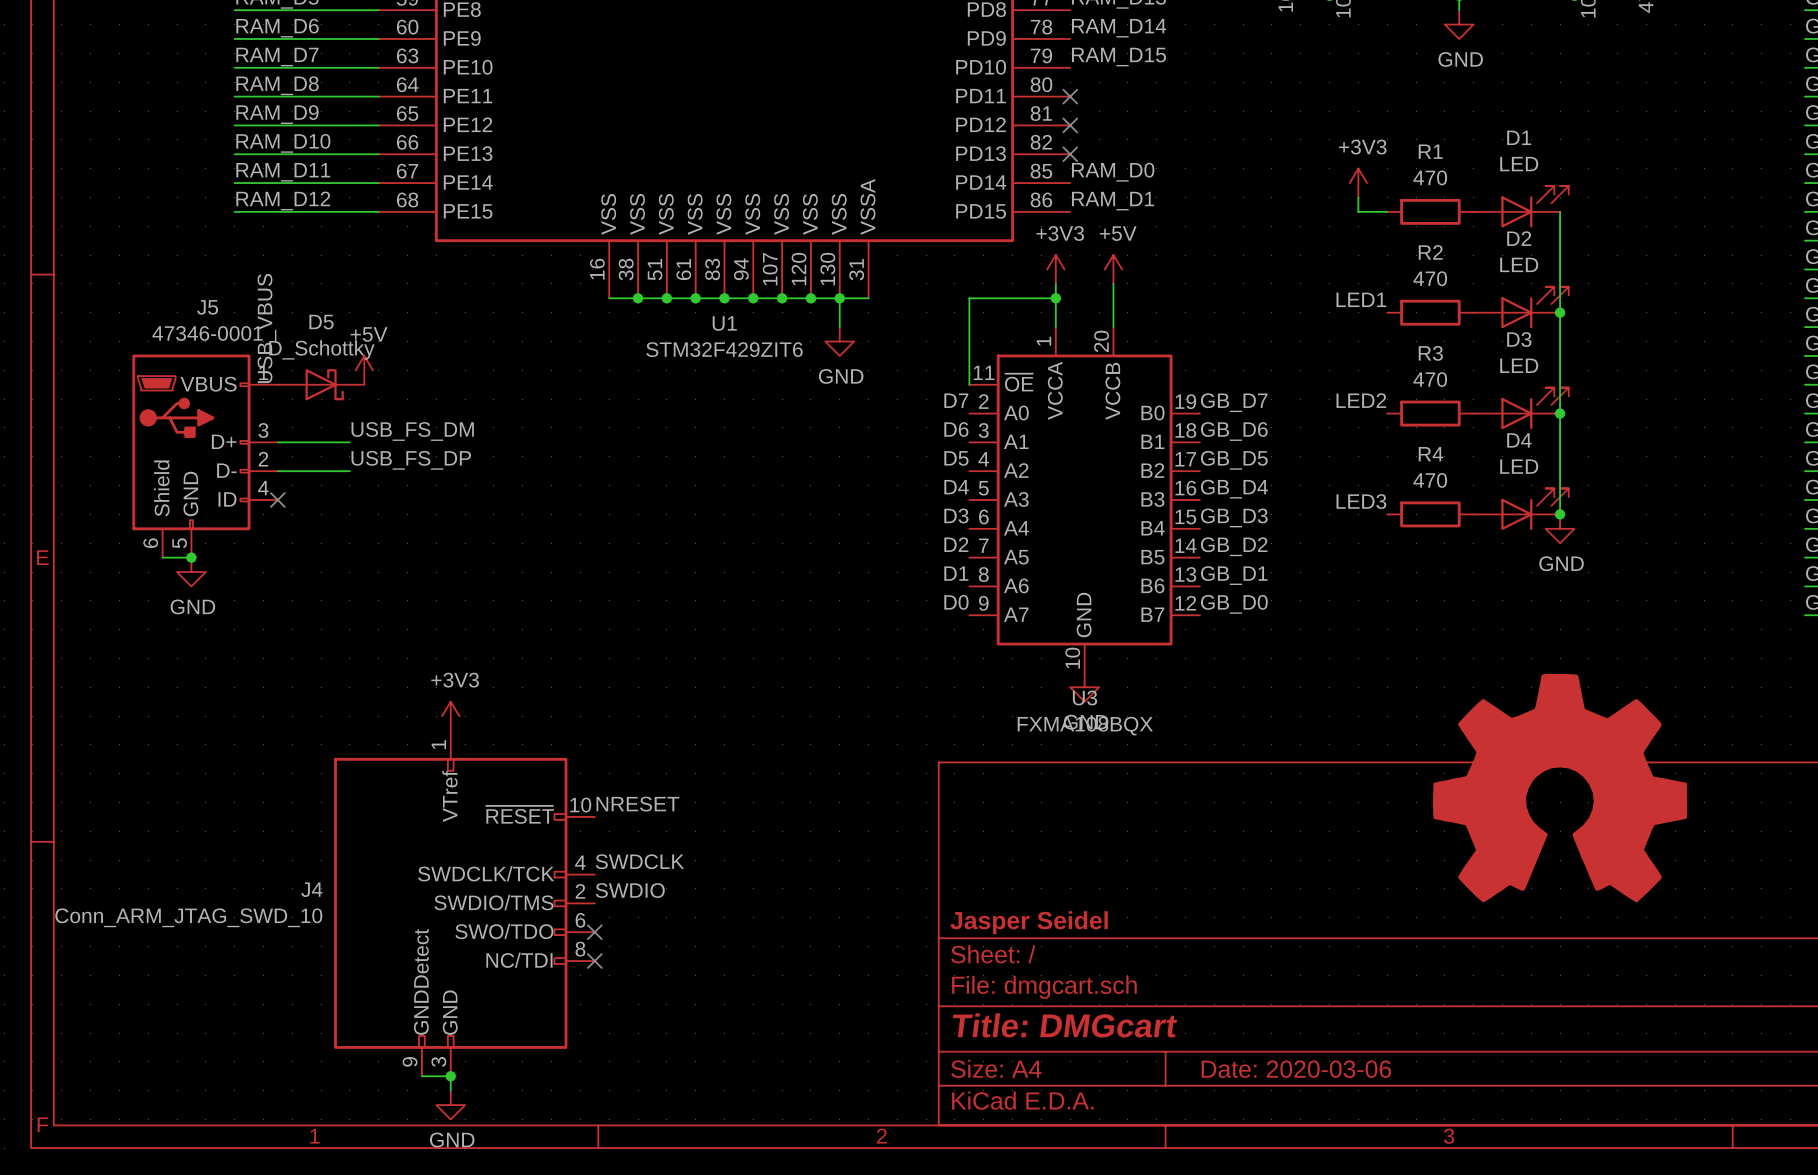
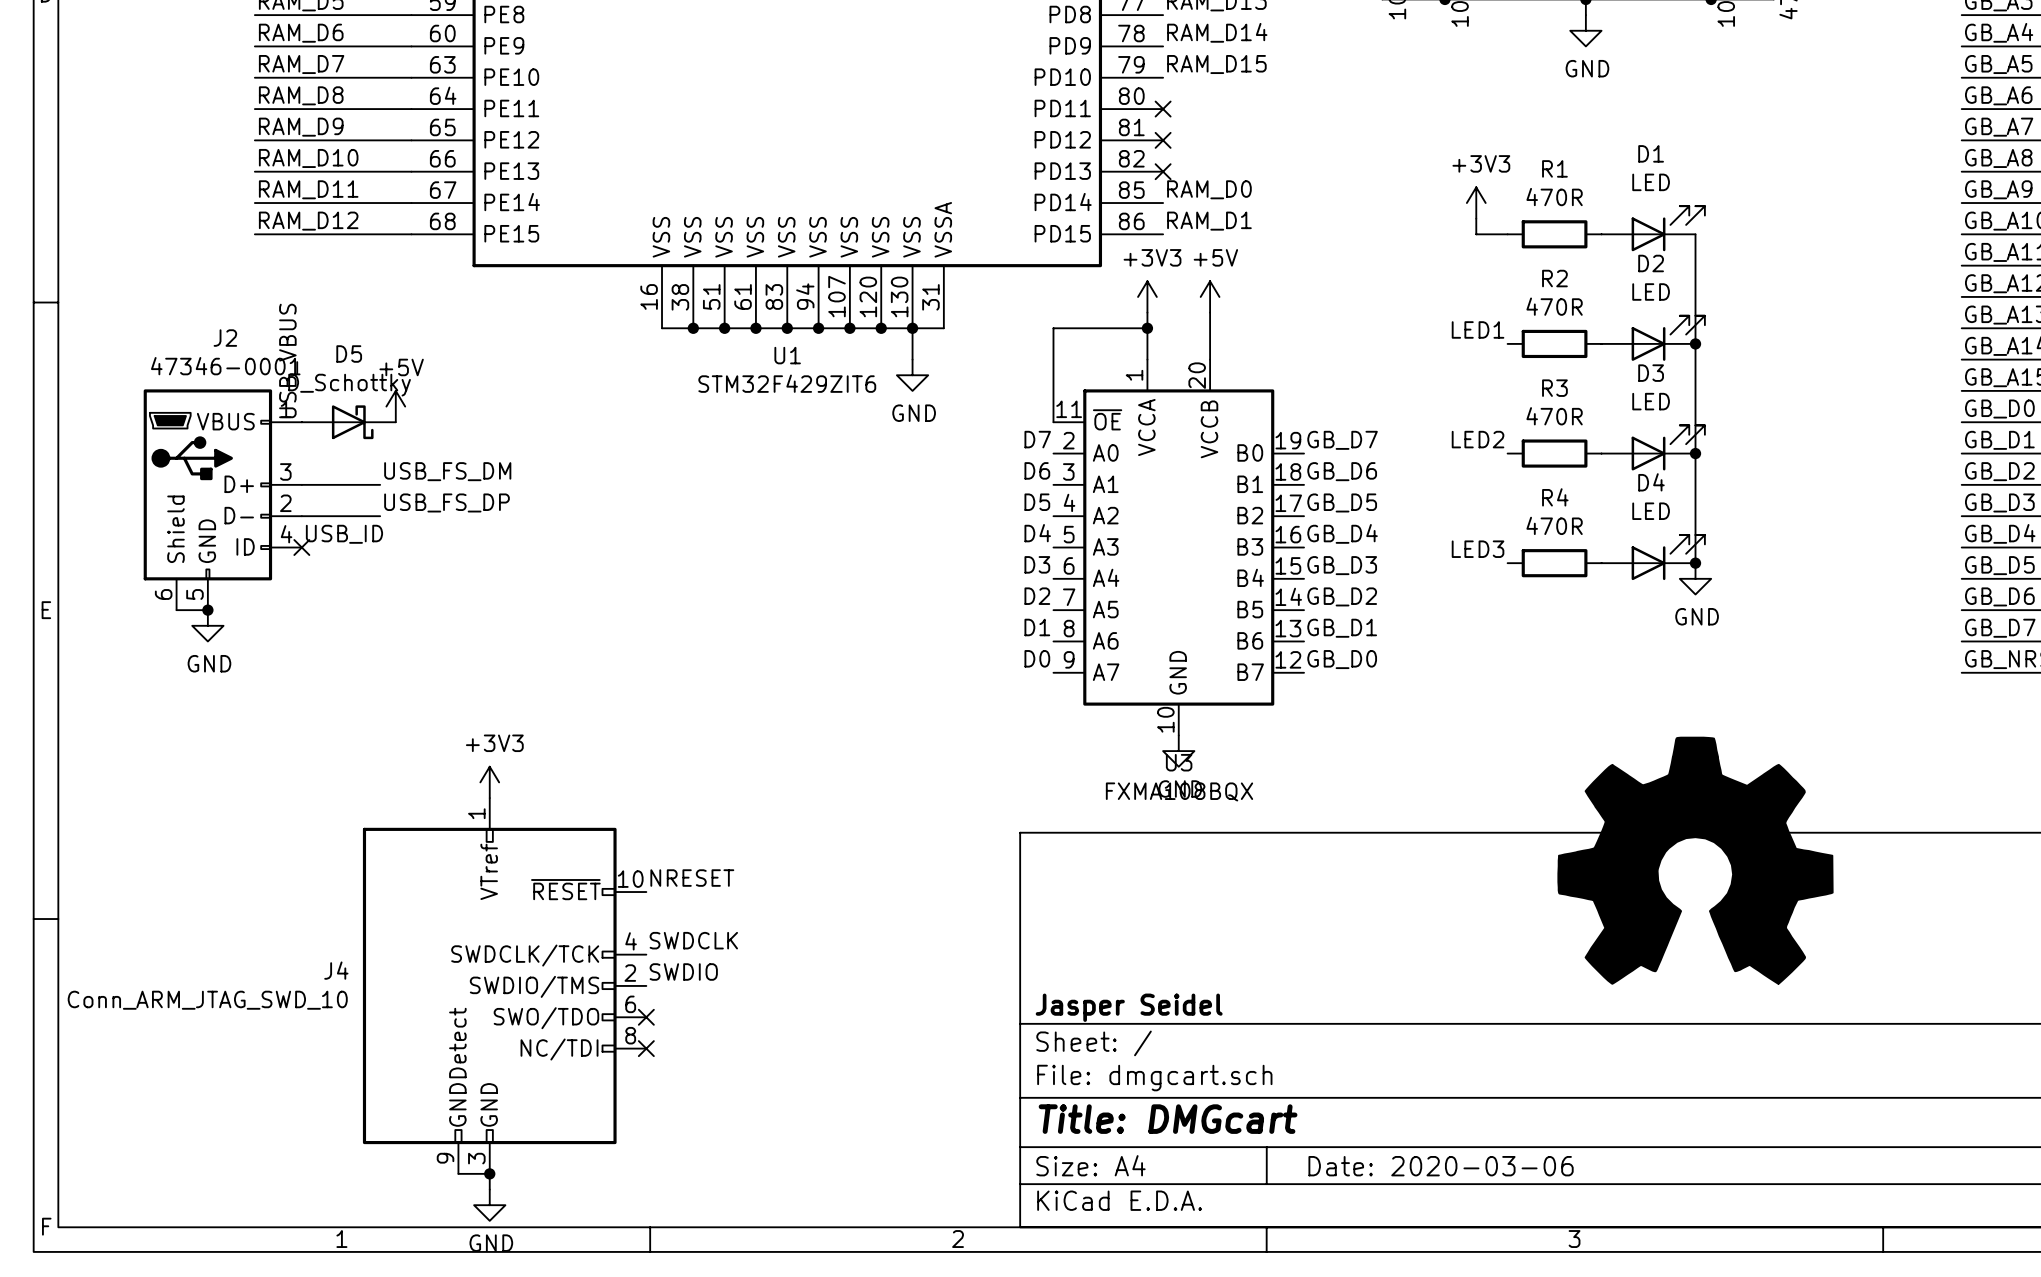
R1 value: 470 (1430, 177) -> 470R (1554, 197)
R2 value: 470 (1430, 278) -> 470R (1554, 306)
J5 name: J5 (207, 307) -> J2 (225, 338)
R3 value: 470 (1430, 379) -> 470R (1554, 416)
R4 value: 470 (1430, 480) -> 470R (1554, 525)
label: none -> USB_ID (344, 534)

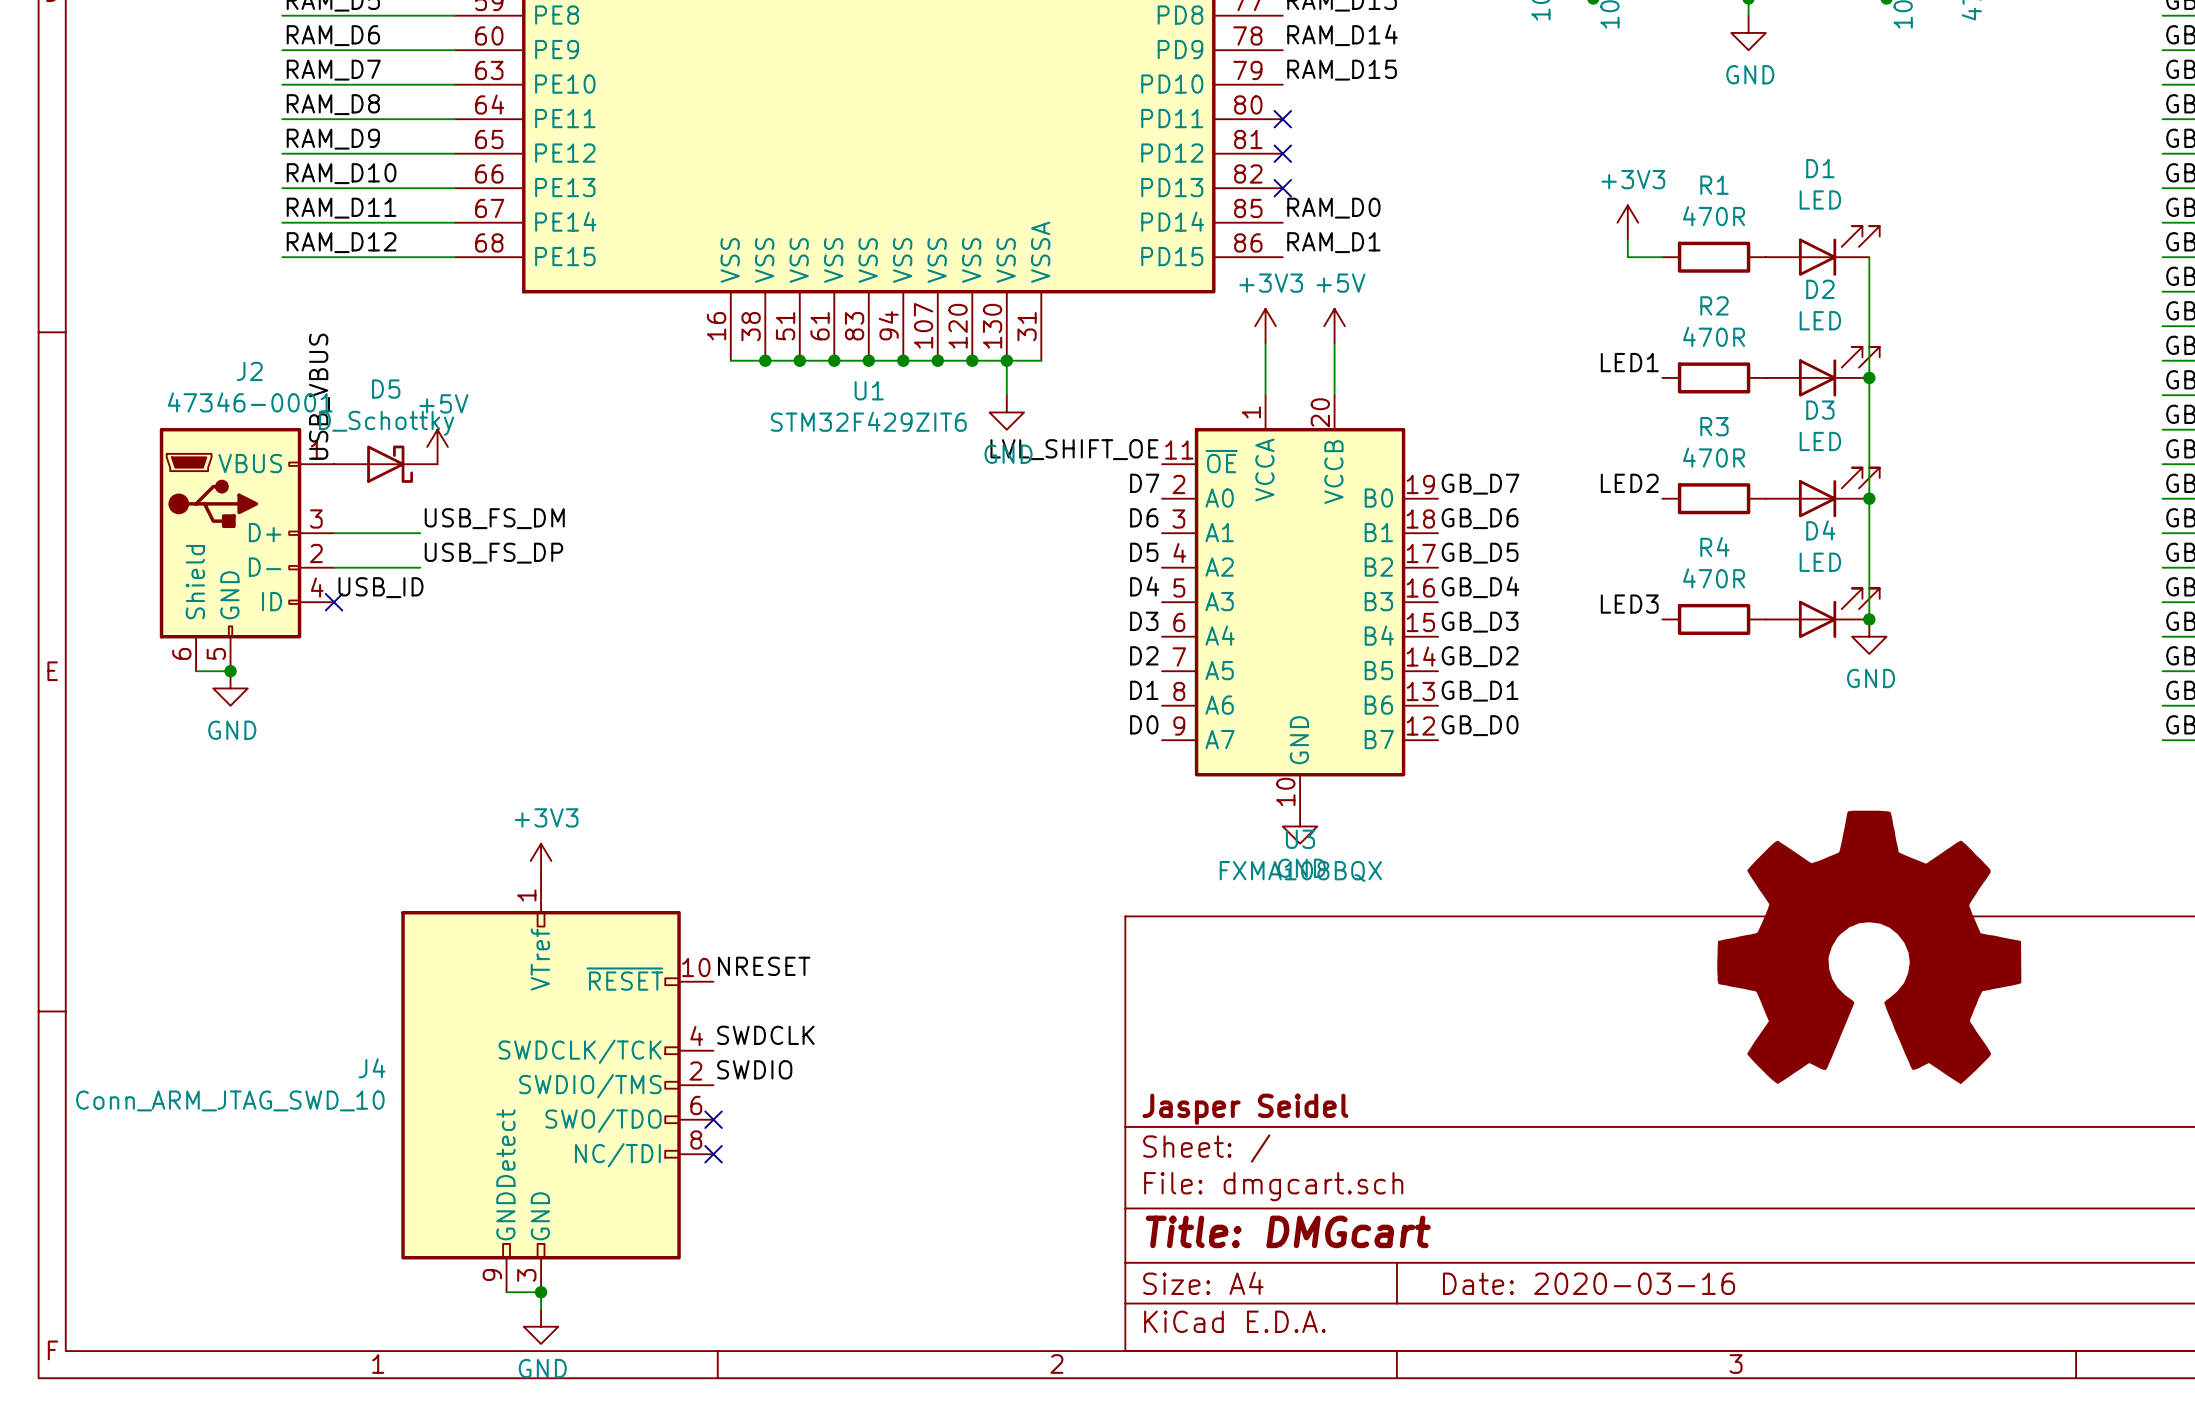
wire: (1147, 328) (1053, 328) (1053, 422) -> none
junction: (1147, 328) -> none
label: none -> LVL_SHIFT_OE (1074, 449)
title block: Date: 2020-03-06 (1441, 1166) -> Date: 2020-03-16 (1589, 1283)

